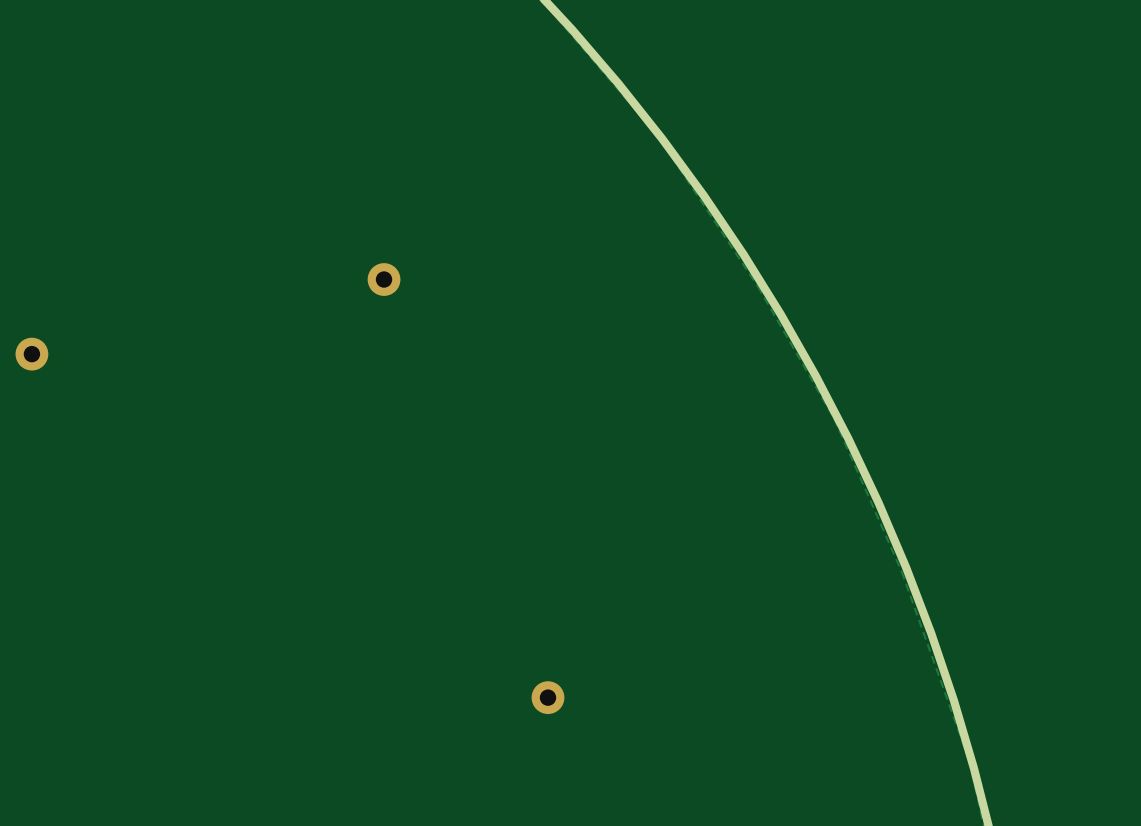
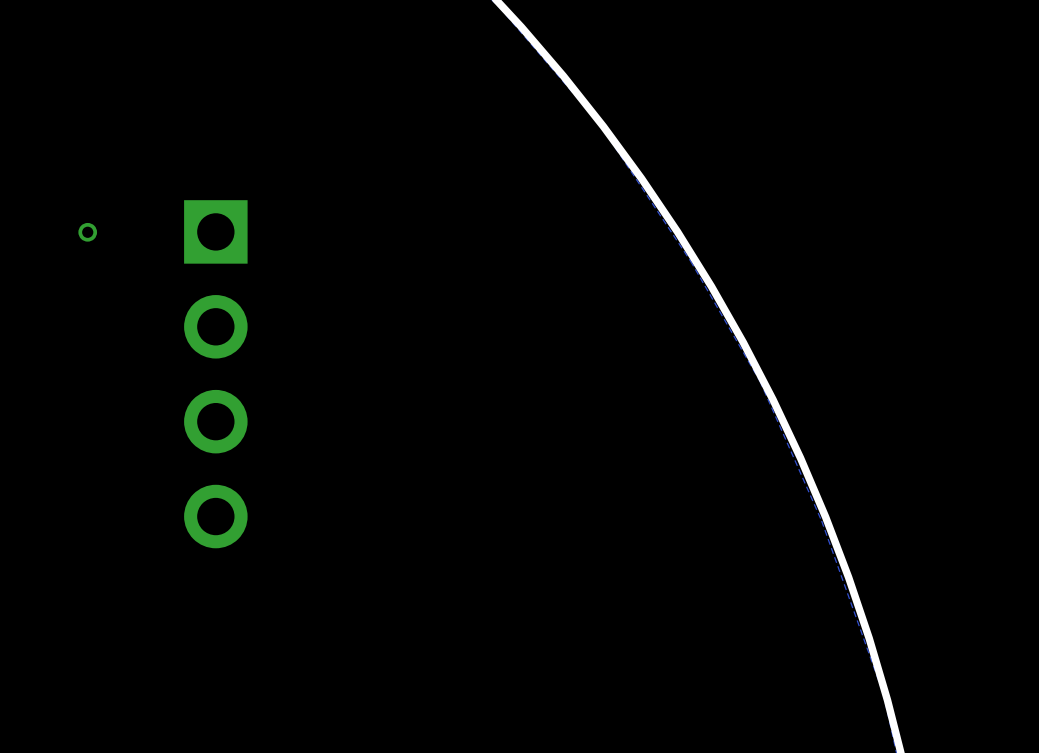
via: none -> (87, 232)
via: (384, 279) -> none
via: (31, 354) -> none
part: none -> (215, 374)
via: (548, 697) -> none

